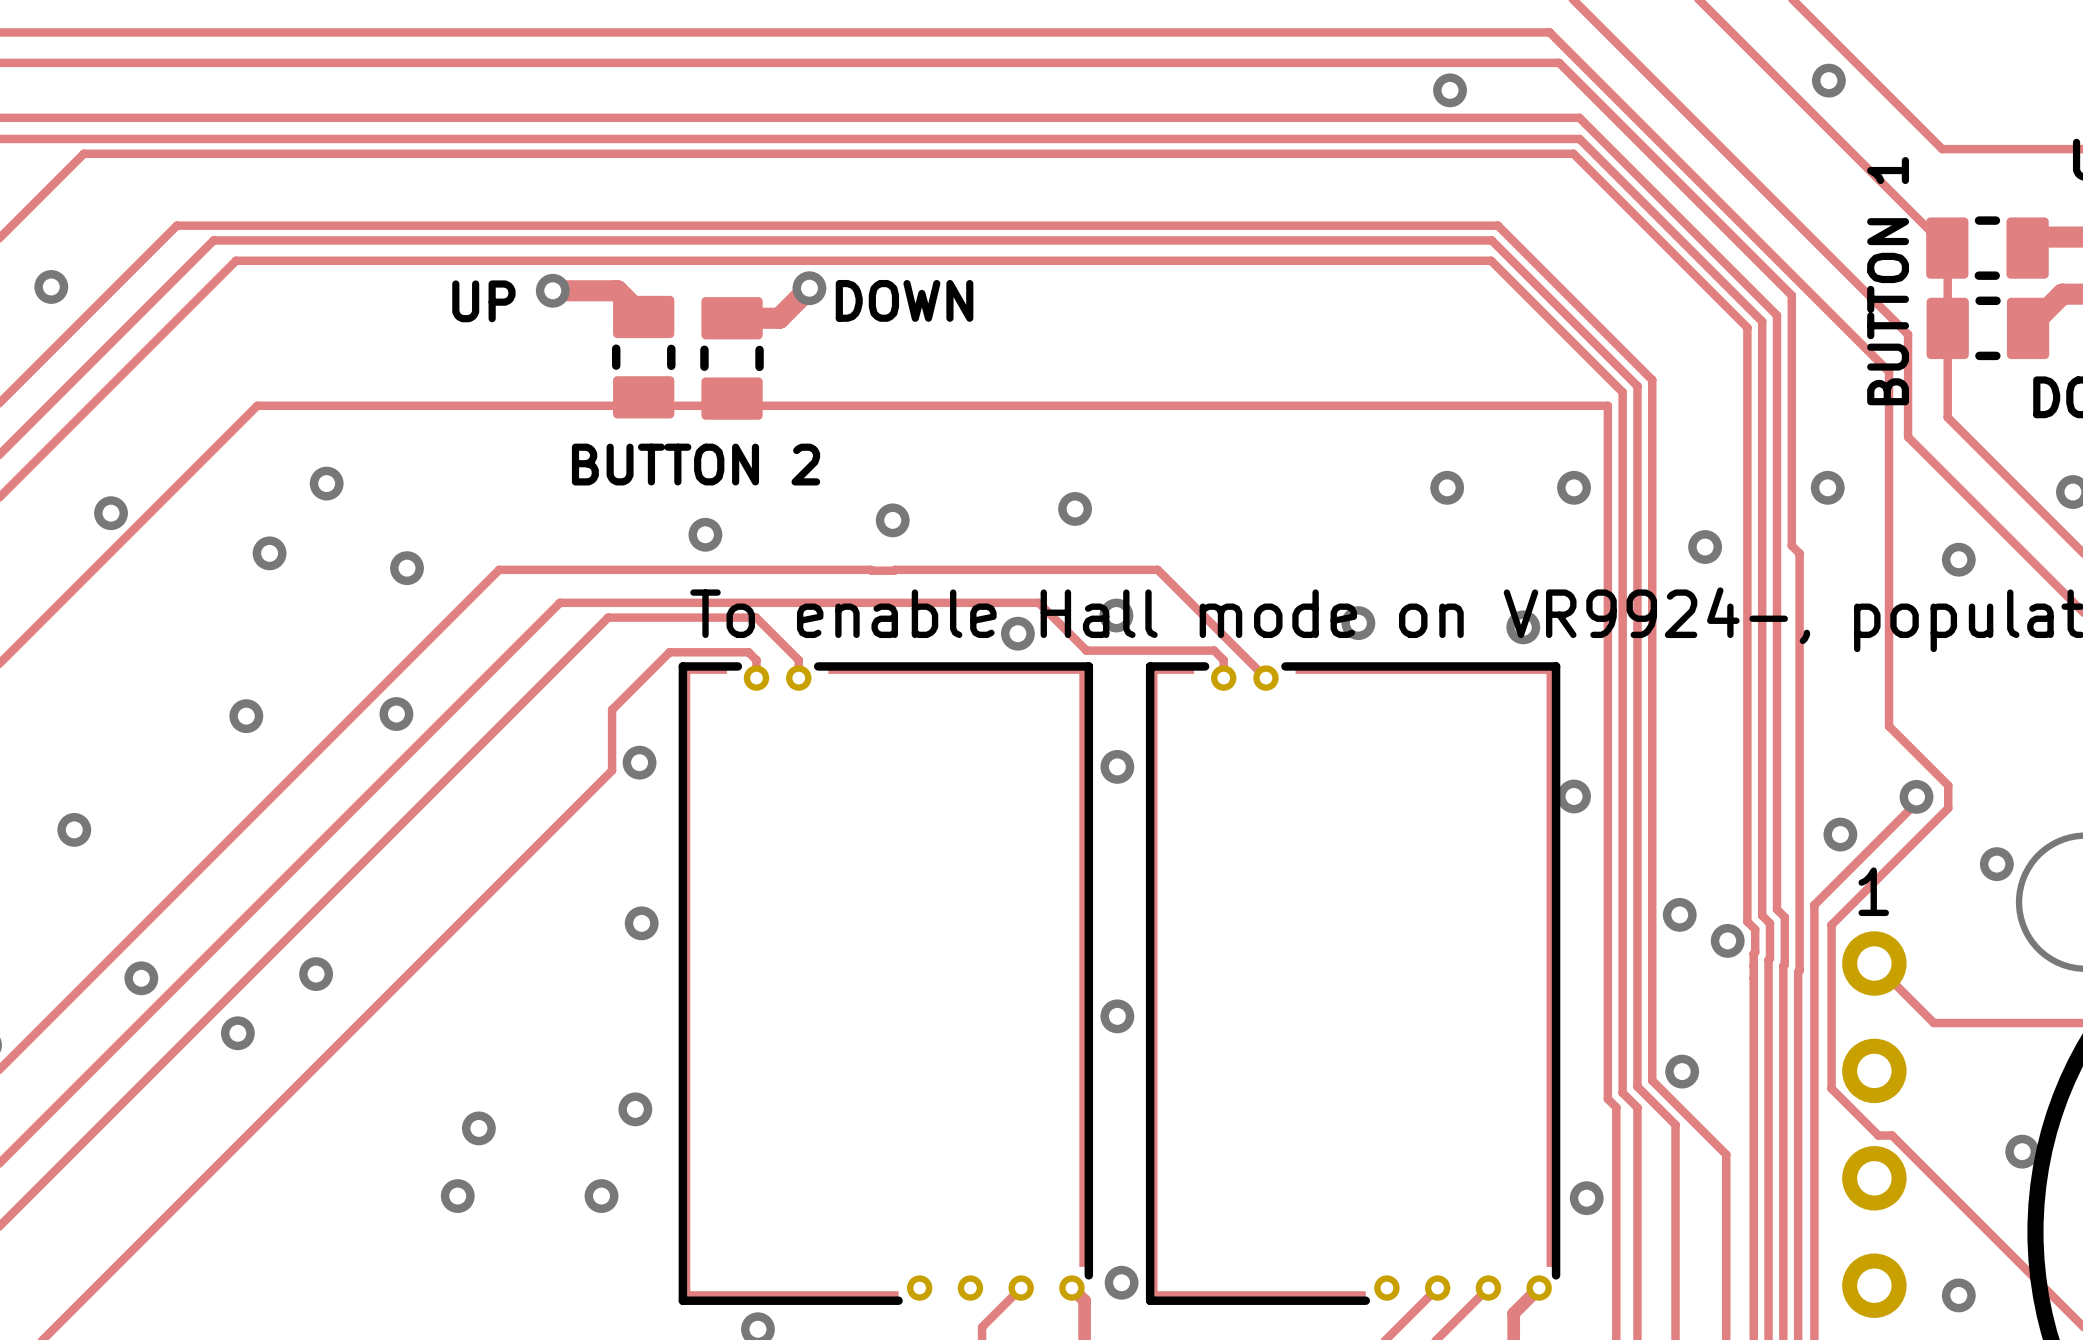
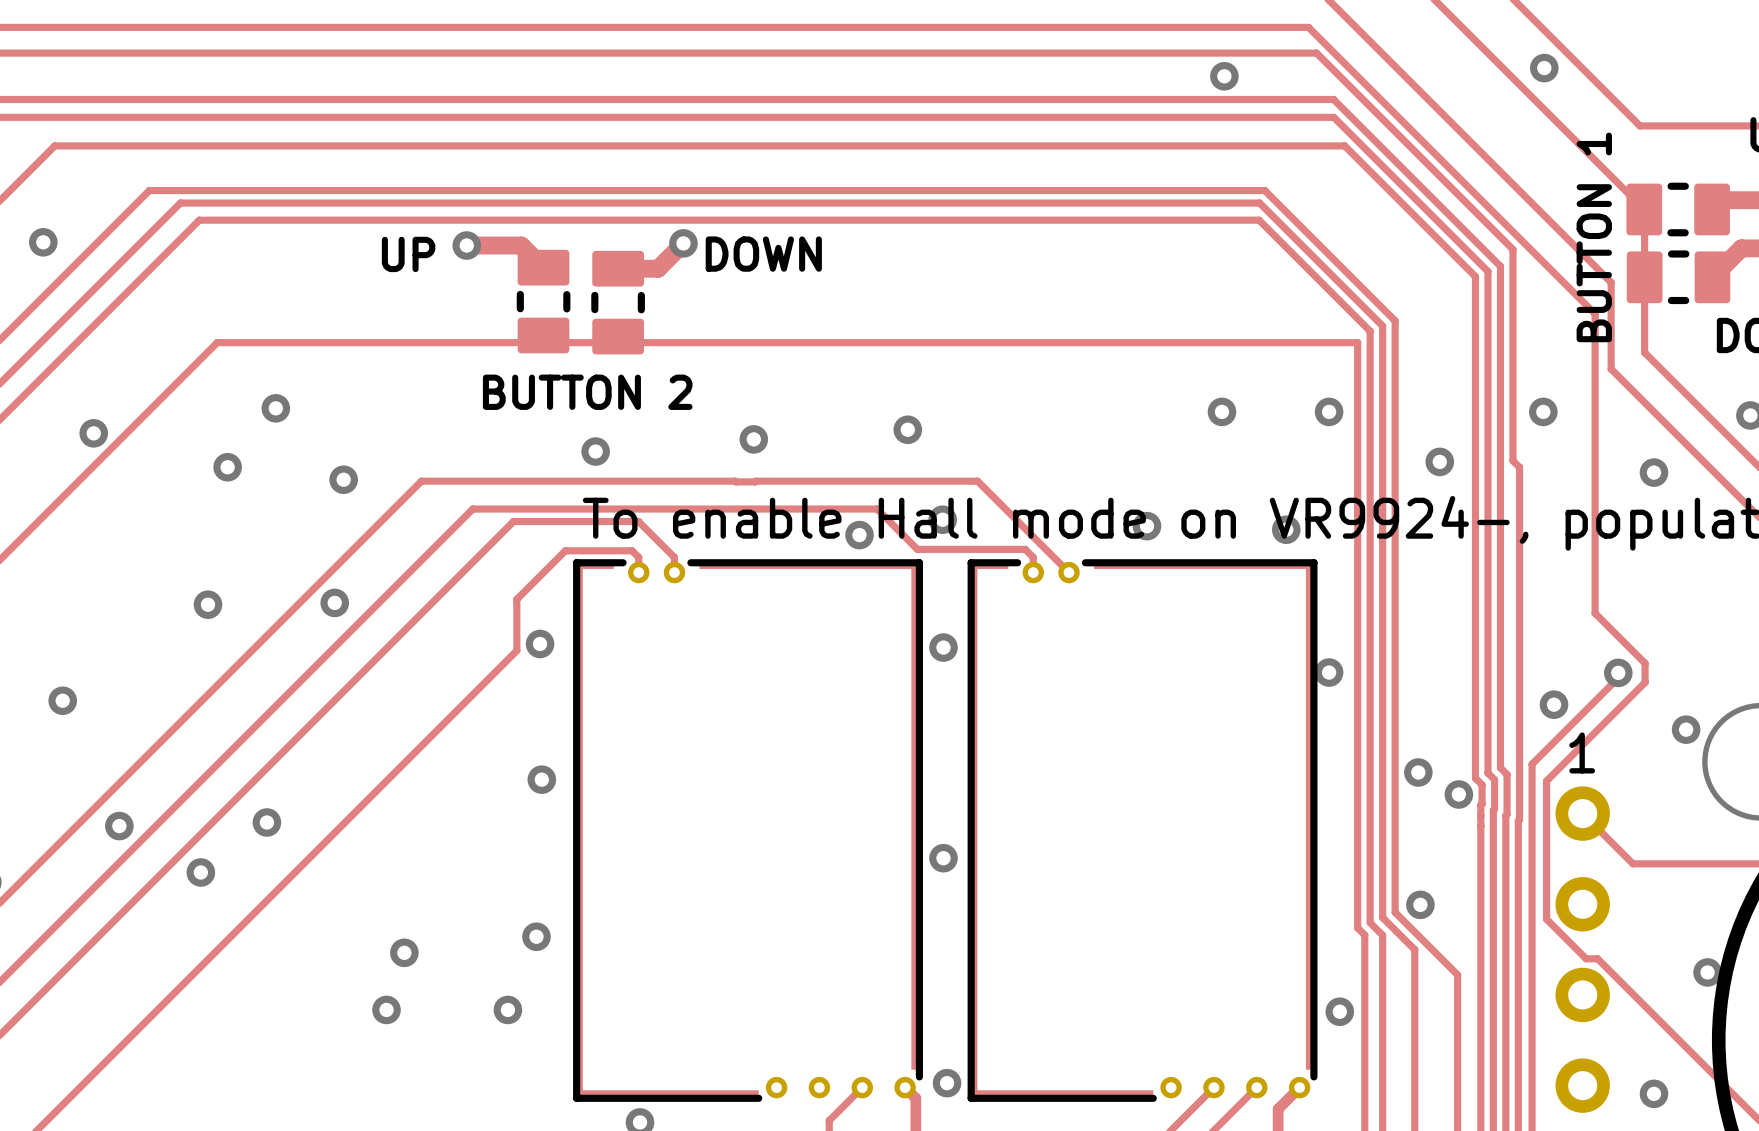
track: (64, 172) (83, 153) (1573, 153) (1592, 172) -> (54, 145) (1344, 145)

